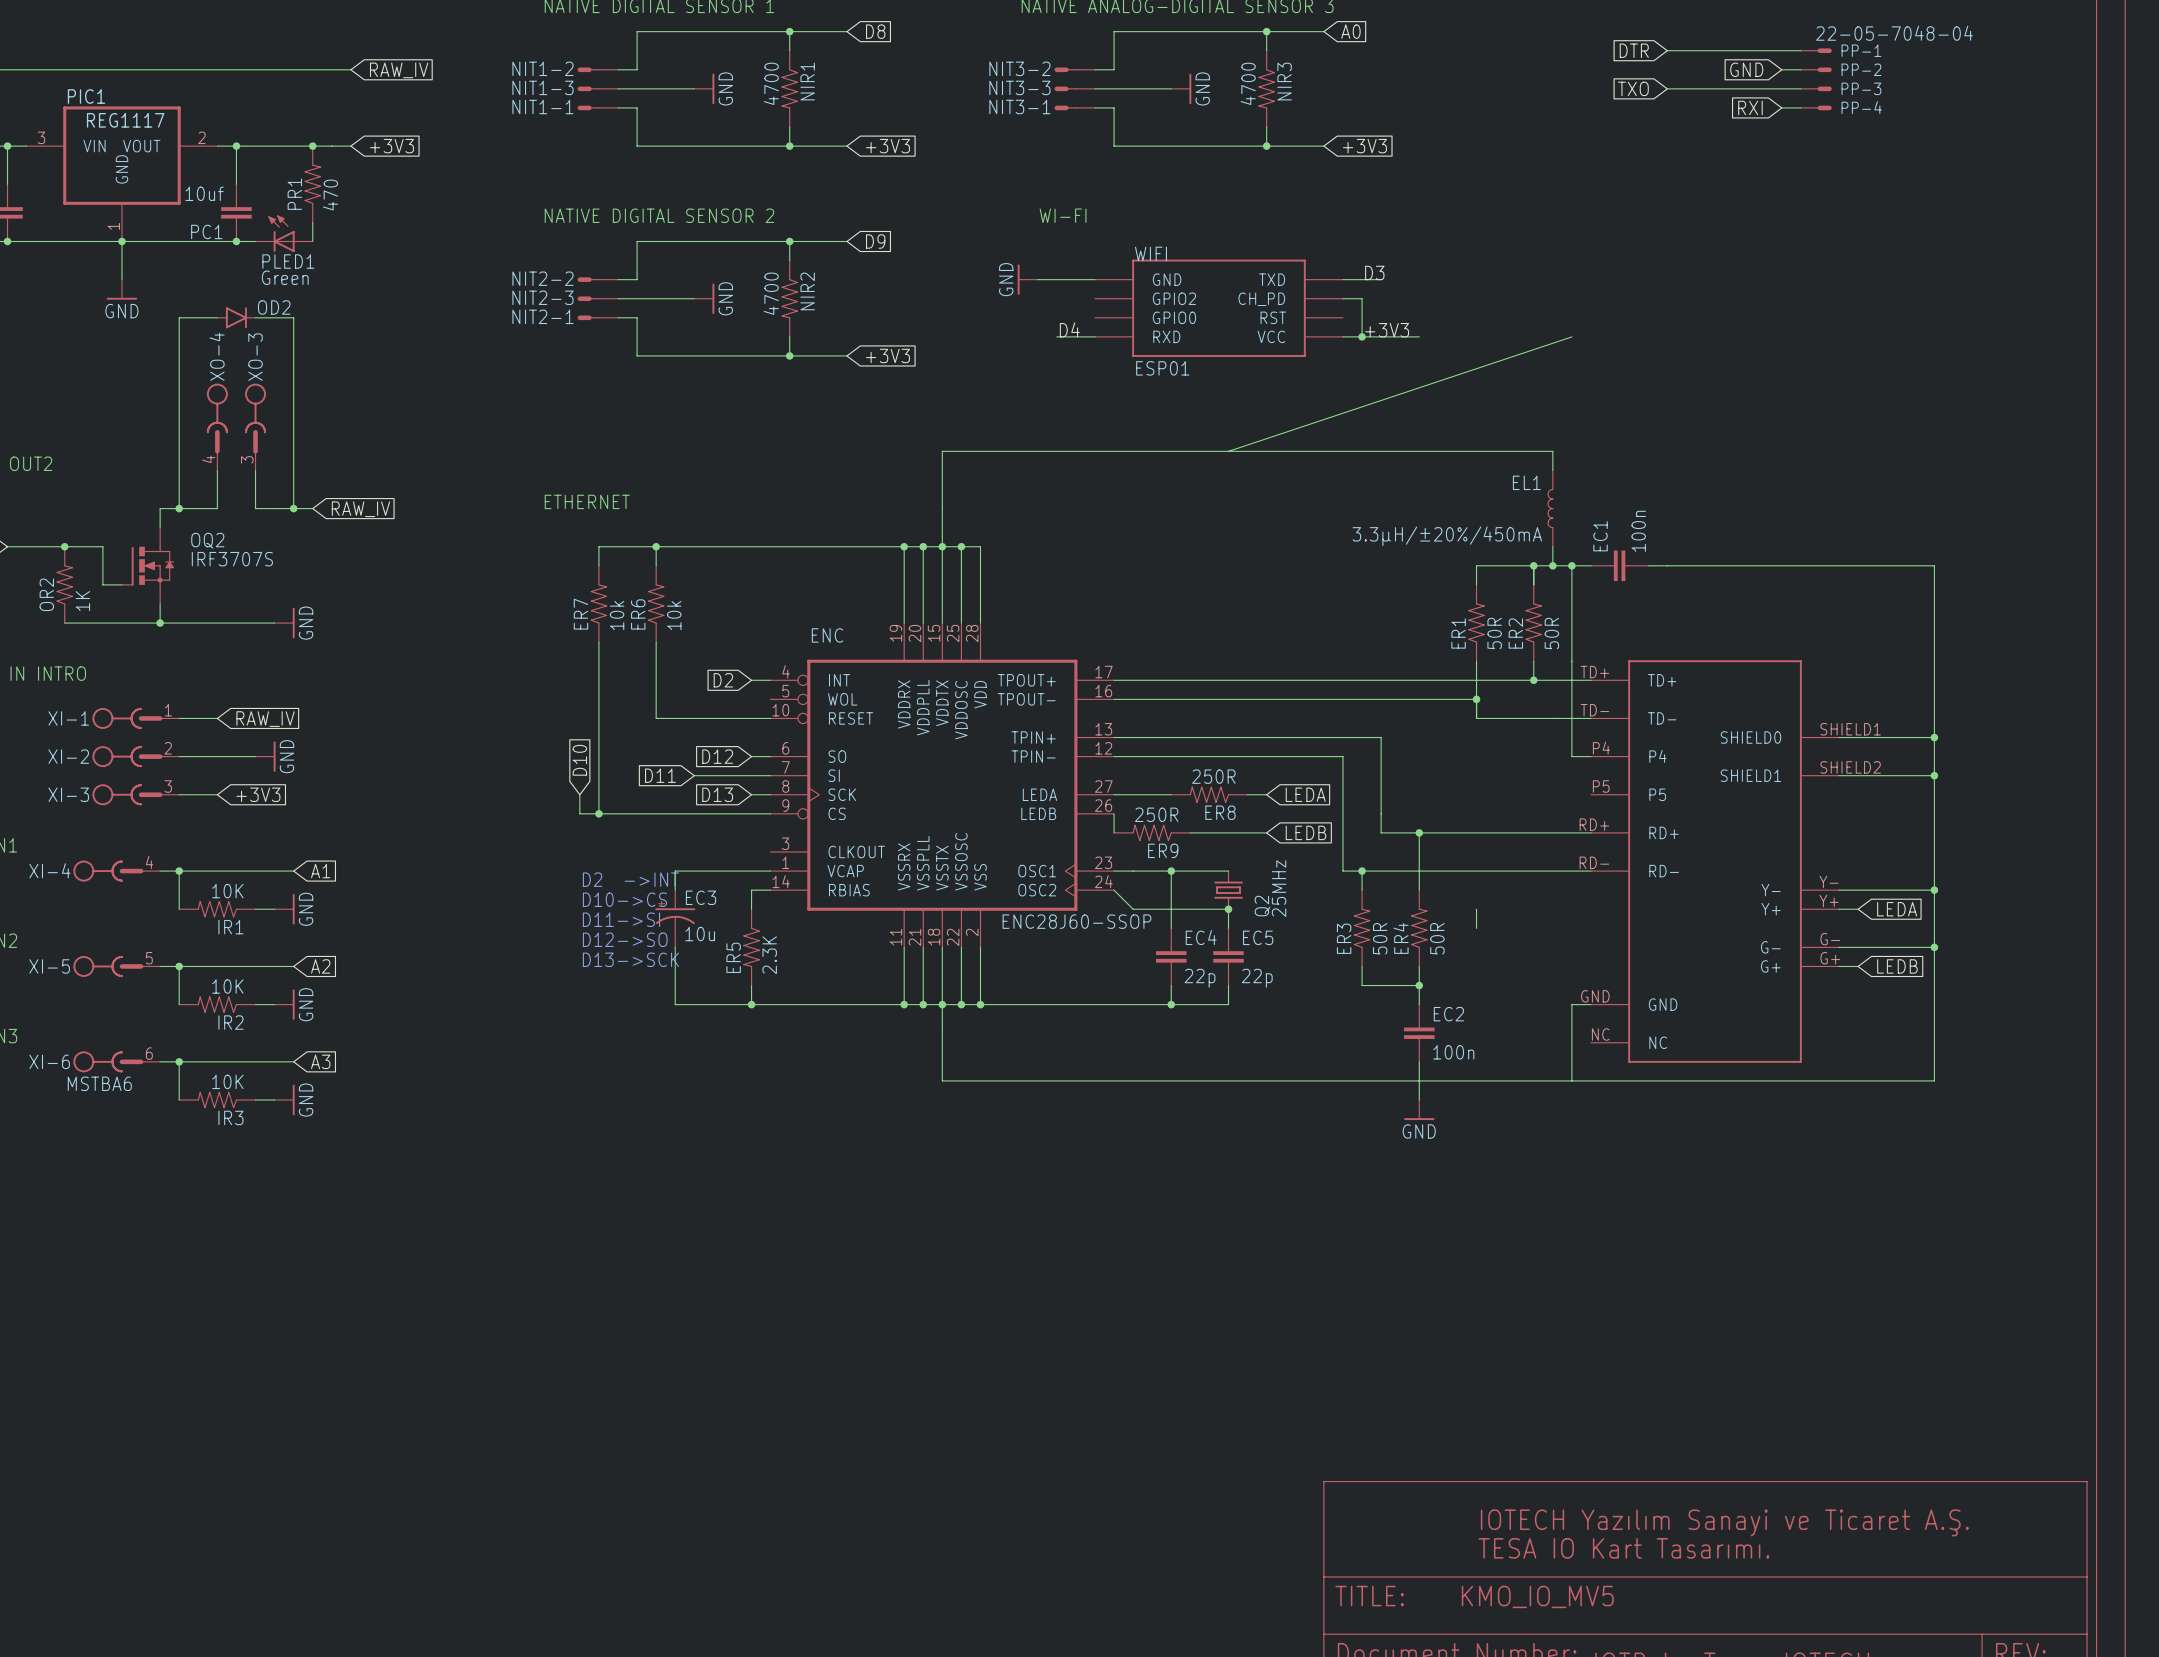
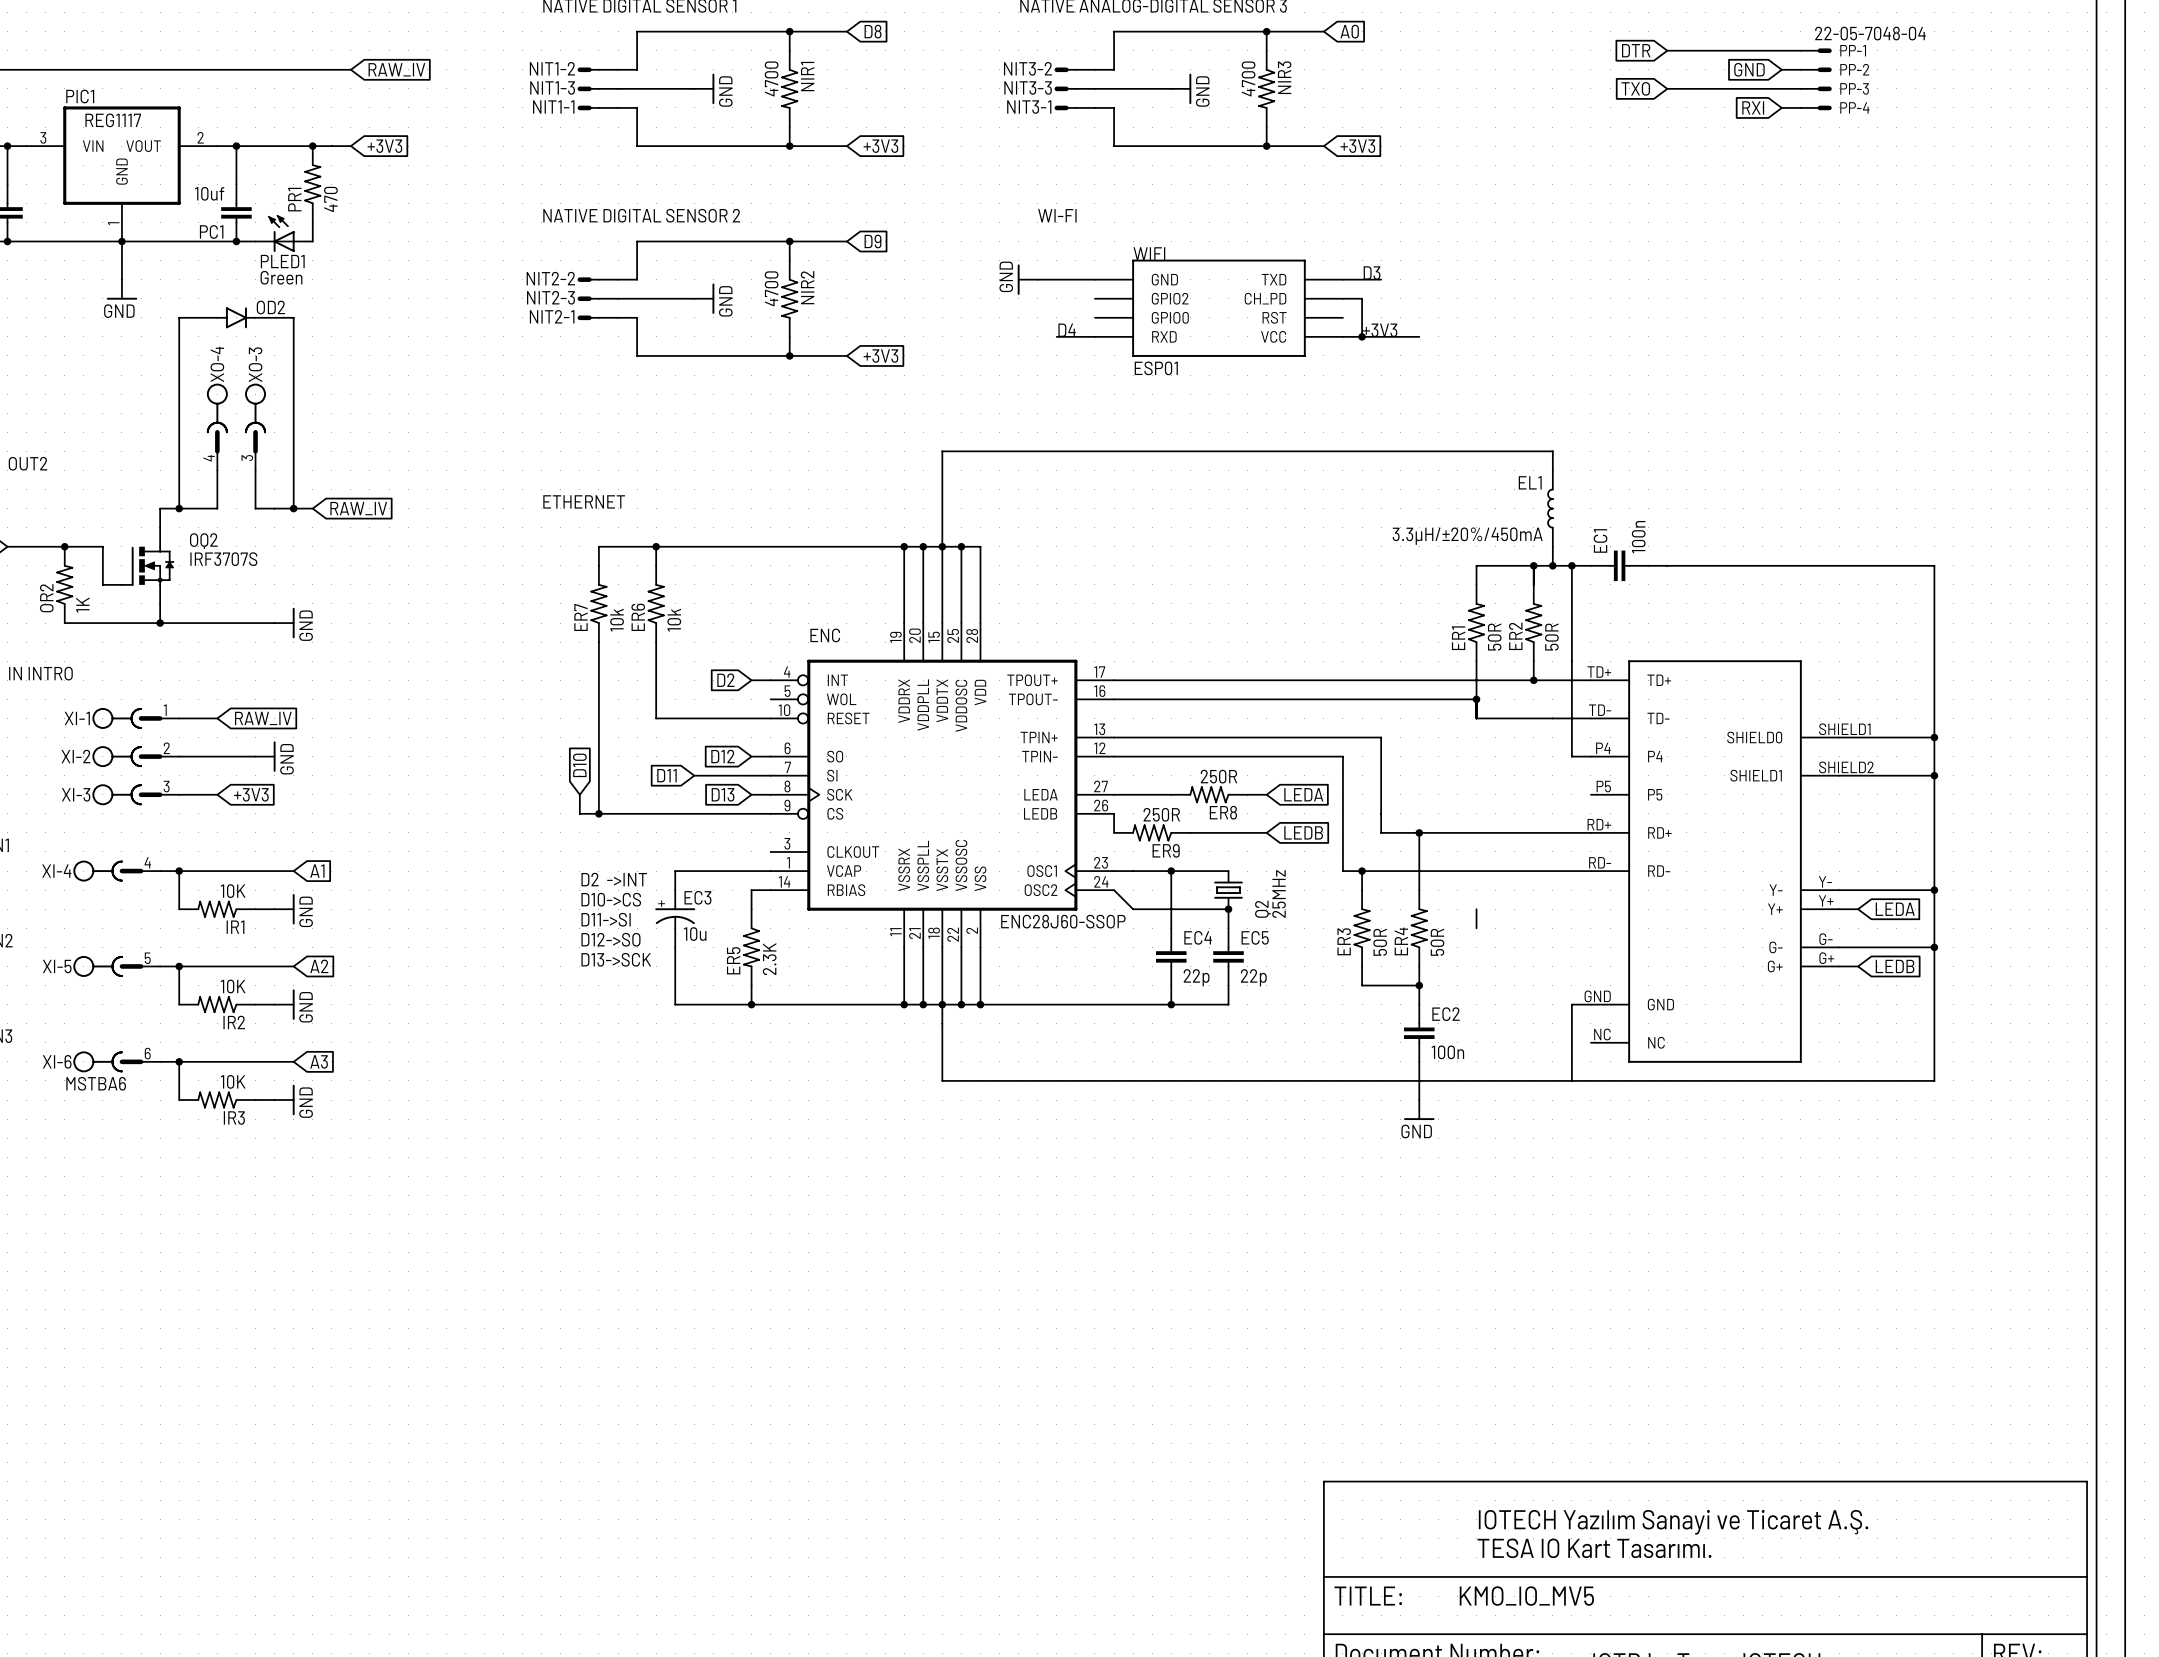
wire: (1571, 336) (1228, 451) -> none

